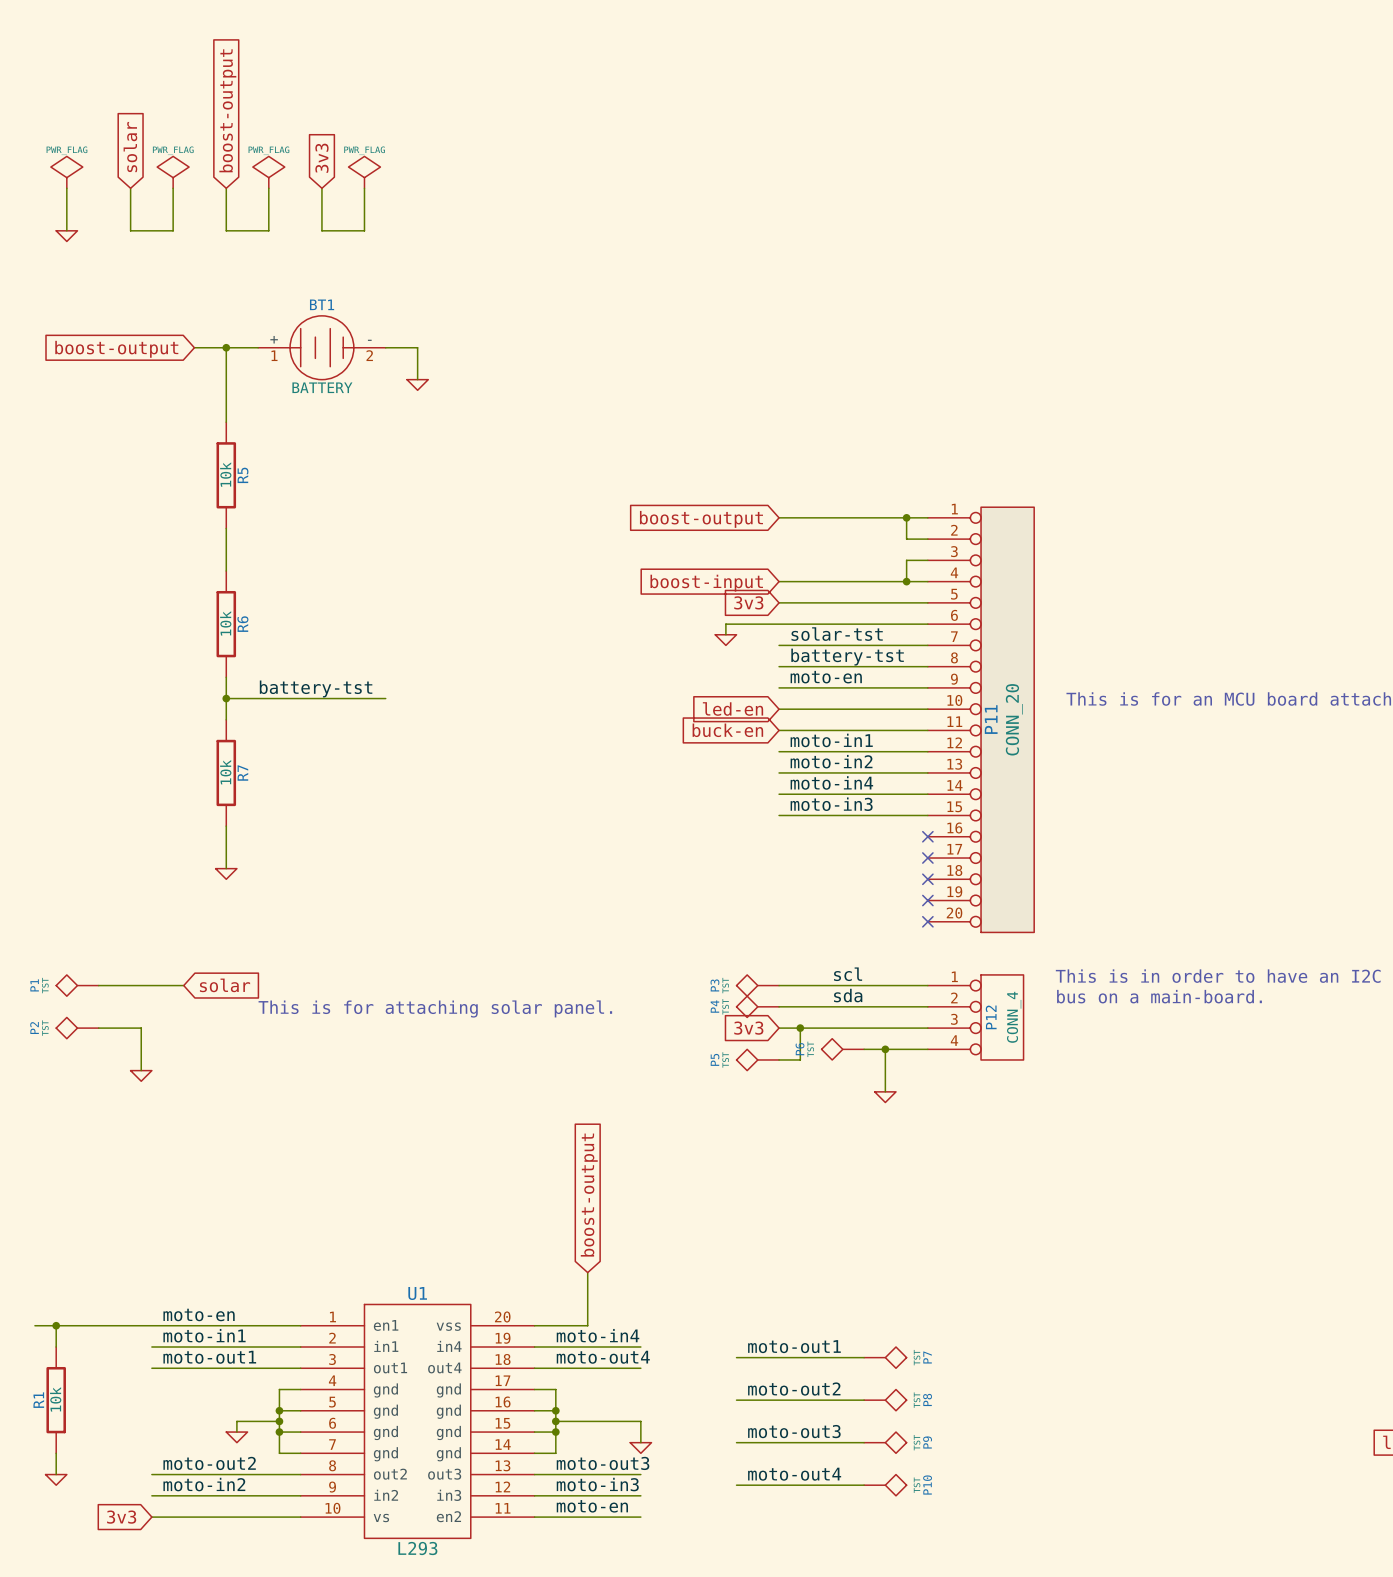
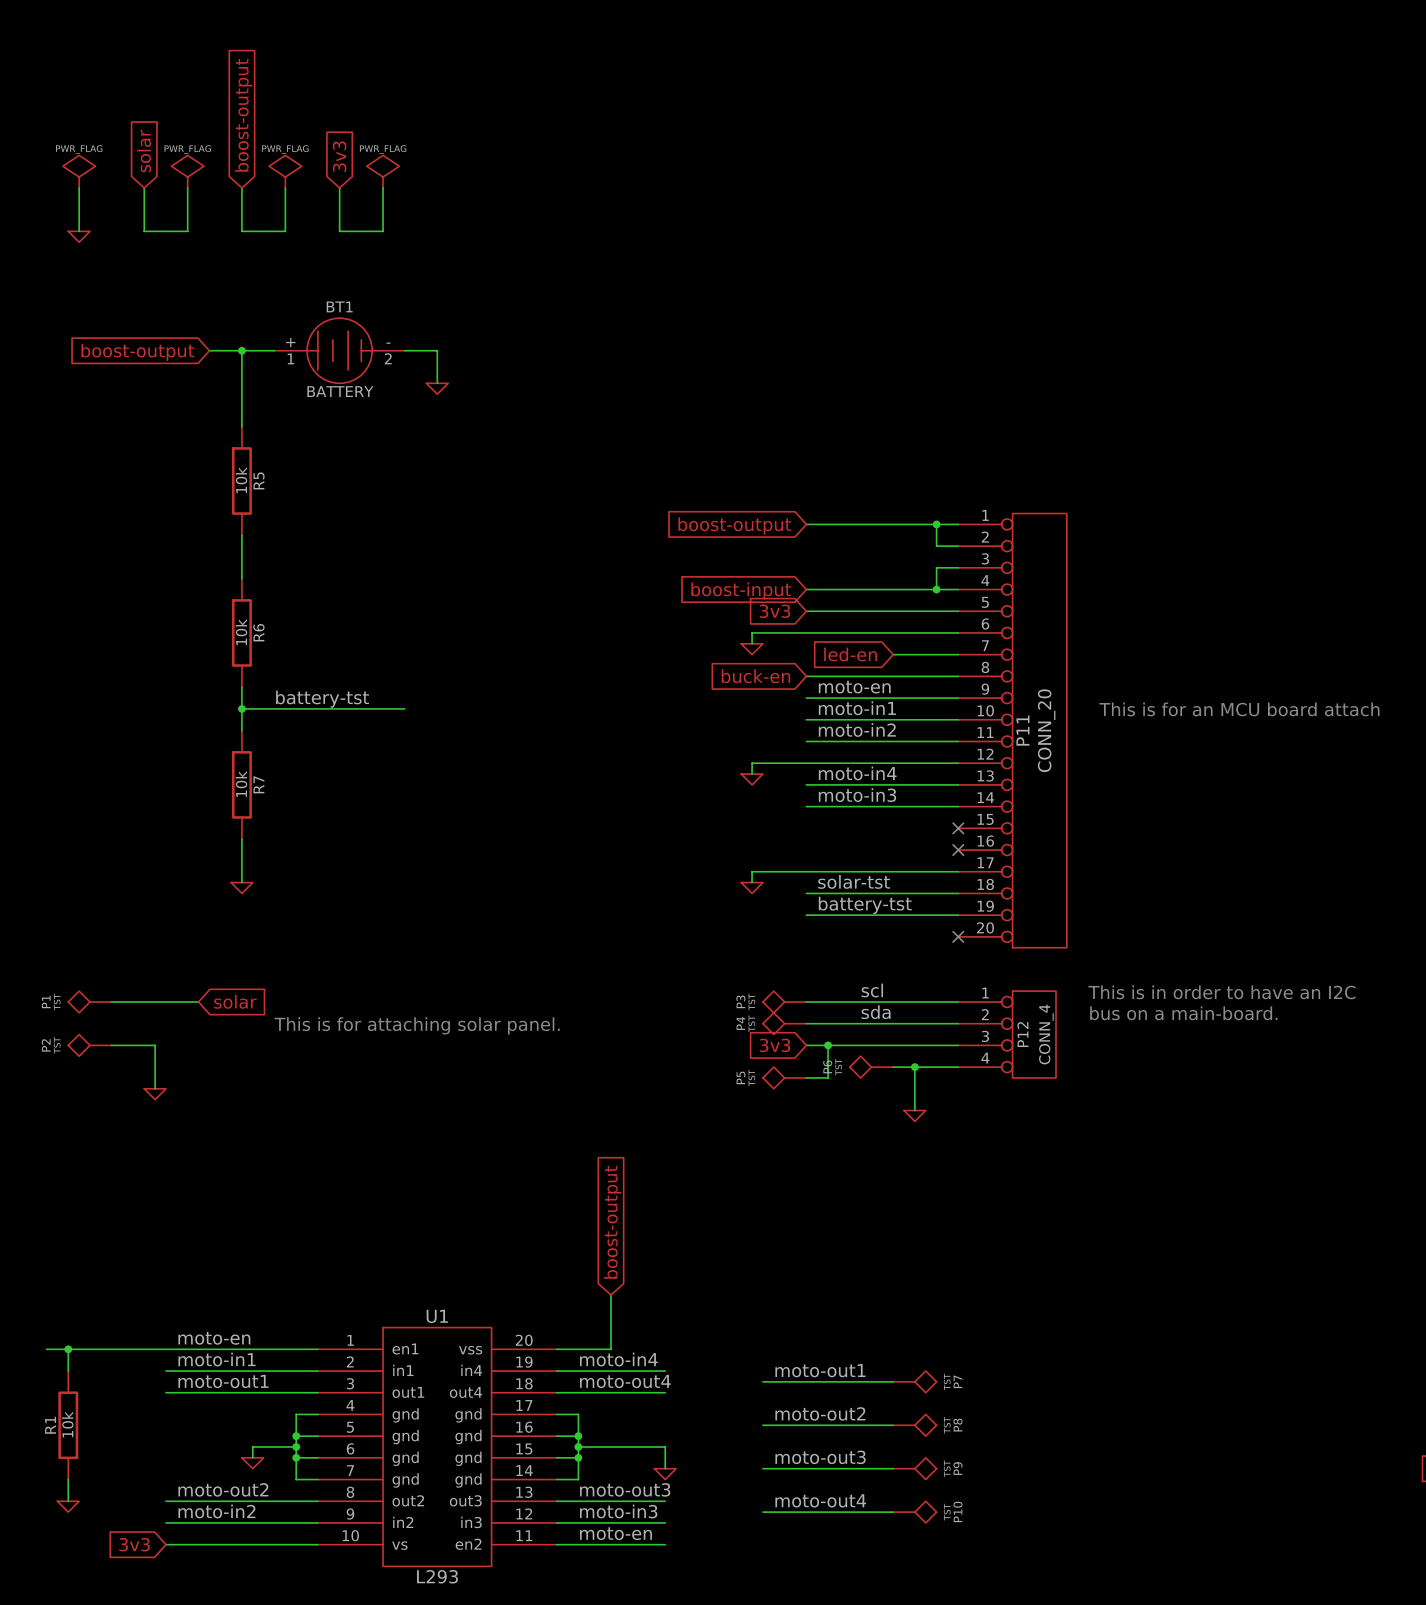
label: solar-tst (837, 634) -> none
wire: (779, 645) (864, 645) -> none
label: battery-tst (847, 657) -> none
global label position: led-en (733, 708) -> led-en (850, 654)
label: none -> moto-in2 (857, 729)
global label position: buck-en (727, 730) -> buck-en (755, 676)
label position: moto-in1 (831, 740) -> moto-in1 (857, 708)
wire: none -> (806, 763) (752, 763) (752, 774)
label: moto-in2 (831, 761) -> moto-in4 (857, 773)
power symbol: none -> (752, 779)
label: moto-in4 (831, 782) -> moto-in3 (857, 795)
label: moto-in3 (831, 804) -> none
wire: (779, 815) (927, 815) -> (806, 893) (958, 893)
no-connect mark: none -> (958, 828)
wire: none -> (958, 871) (752, 871) (752, 882)
no-connect mark: (927, 858) -> none
label: none -> solar-tst (854, 881)
power symbol: none -> (752, 888)
no-connect mark: (927, 879) -> none
label: none -> battery-tst (865, 905)
wire: none -> (806, 915) (958, 915)
no-connect mark: (927, 900) -> none

